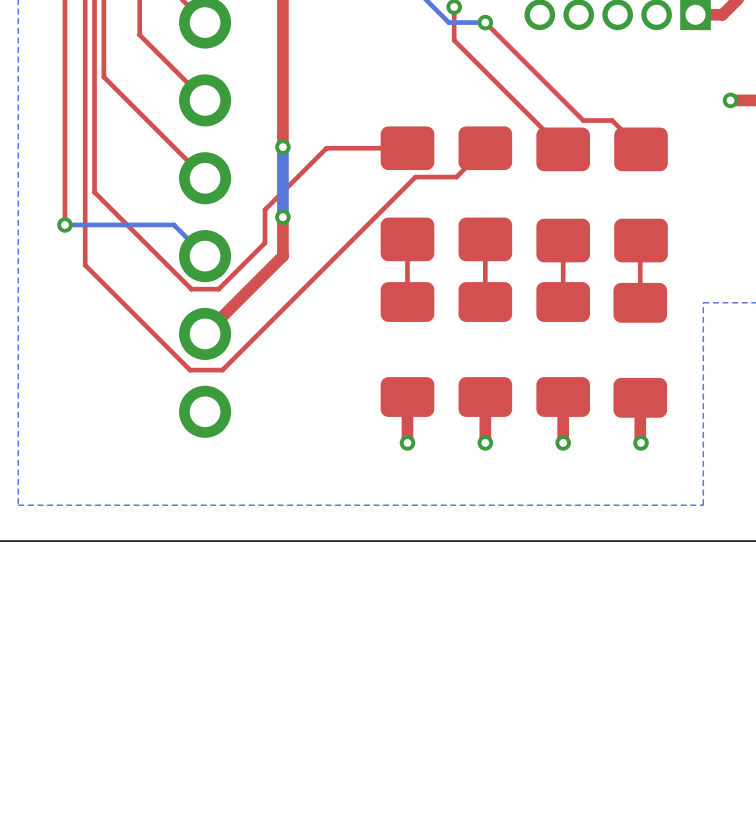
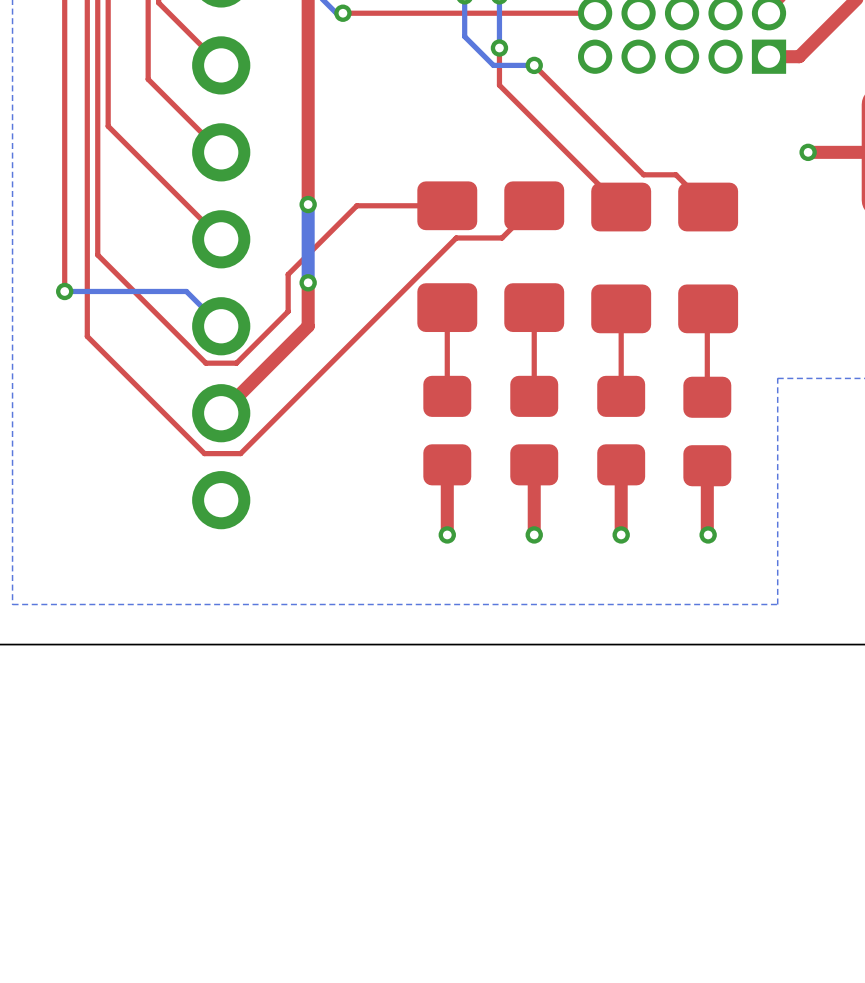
part footprint: [380, 282, 435, 417] -> [423, 375, 472, 486]
part footprint: [458, 282, 513, 417] -> [510, 375, 559, 486]
part footprint: [536, 282, 590, 417] -> [597, 375, 646, 486]
part footprint: [613, 282, 668, 418] -> [683, 376, 732, 487]

